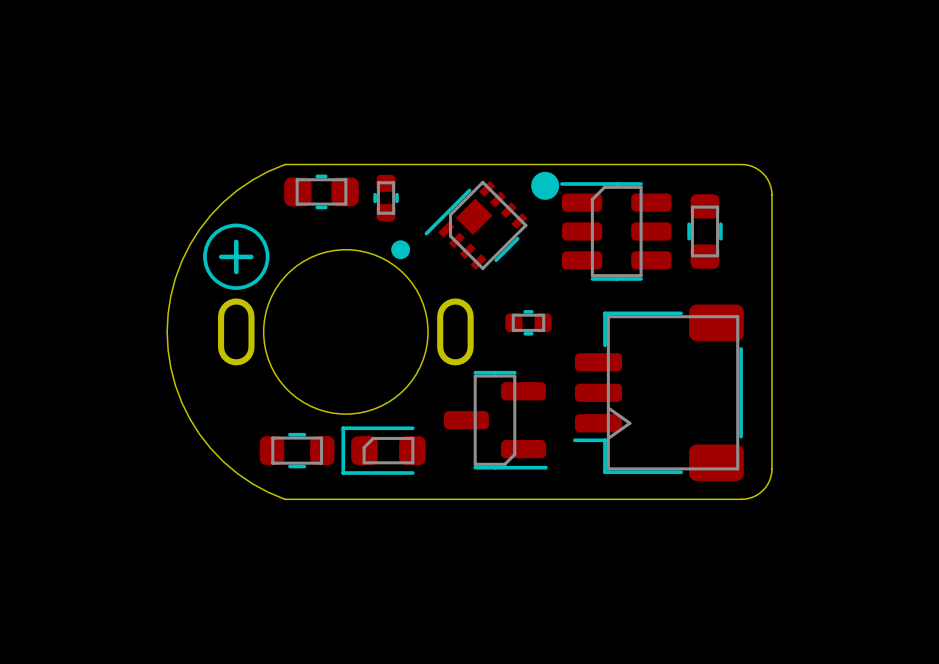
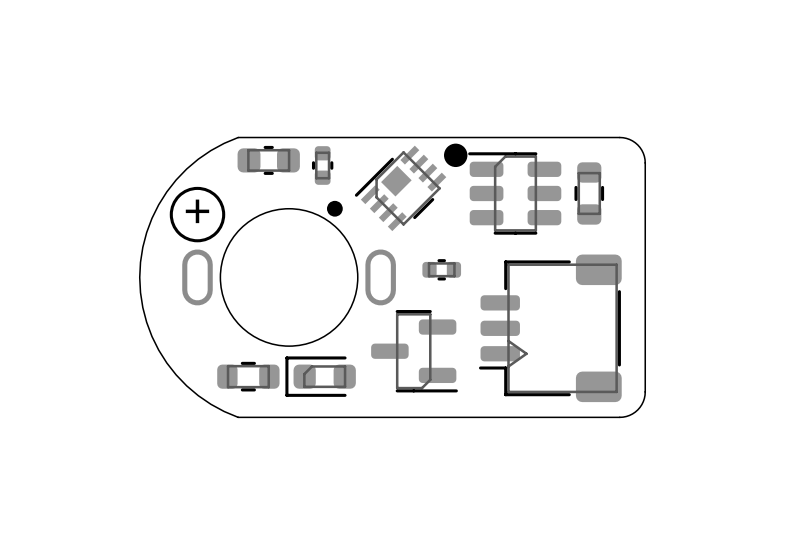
part footprint: [424, 180, 528, 271] -> [354, 145, 447, 232]

